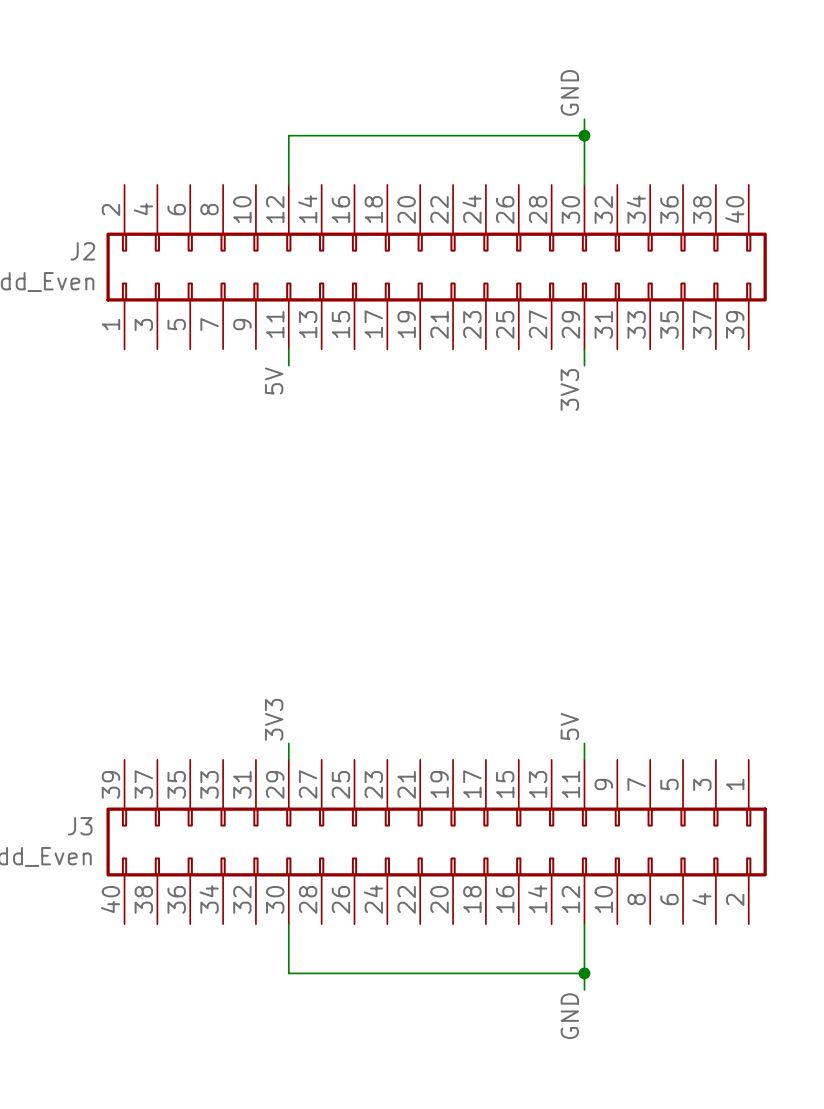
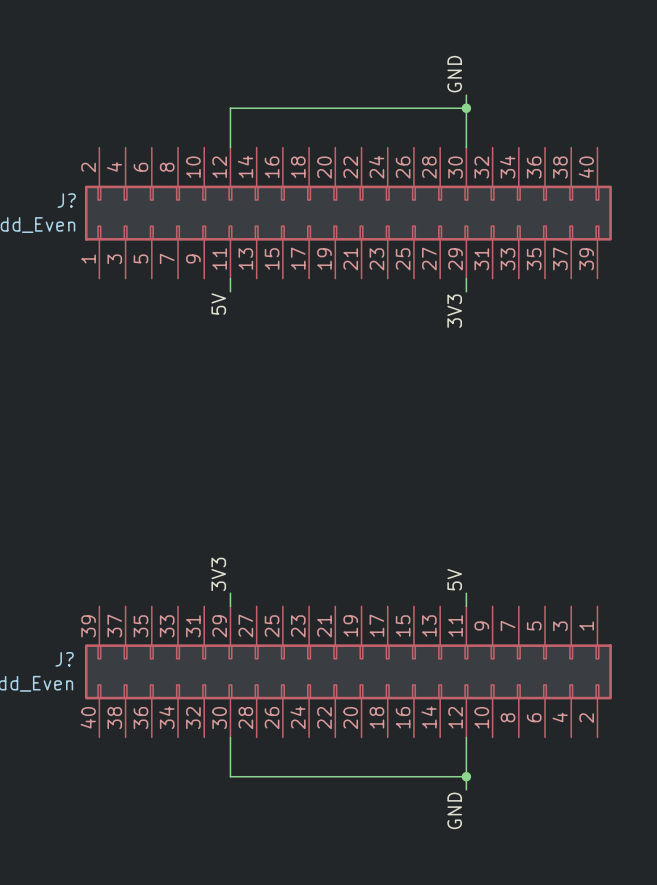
J2 name: J2 (82, 251) -> J? (66, 200)
J3 name: J3 (80, 826) -> J? (64, 659)

